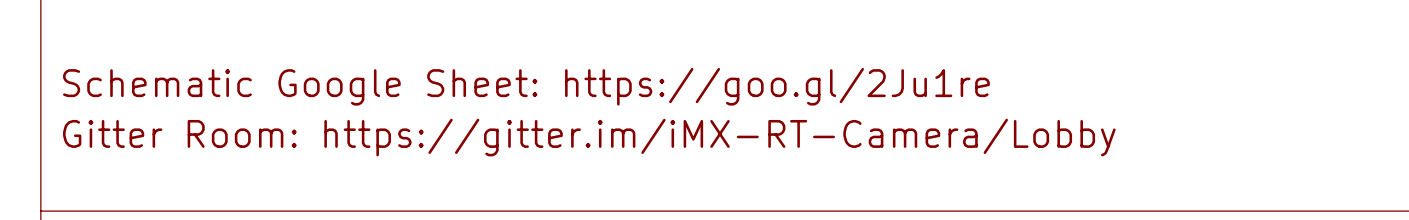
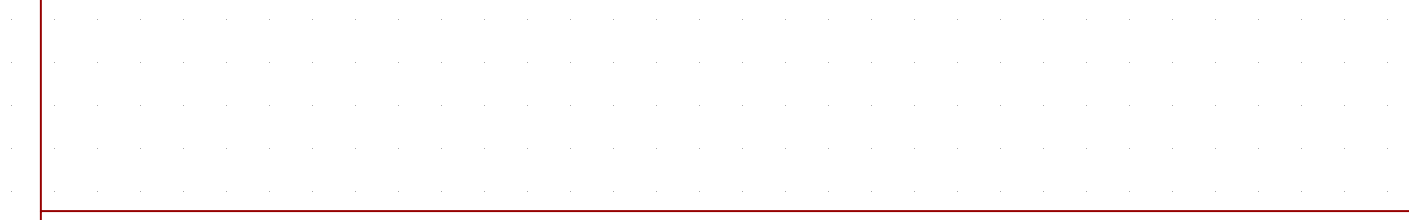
title block: Schematic Google Sheet: https://goo.gl/2Ju1re (526, 86) -> none
title block: Gitter Room: https://gitter.im/iMX-RT-Camera/Lobby (589, 137) -> none

